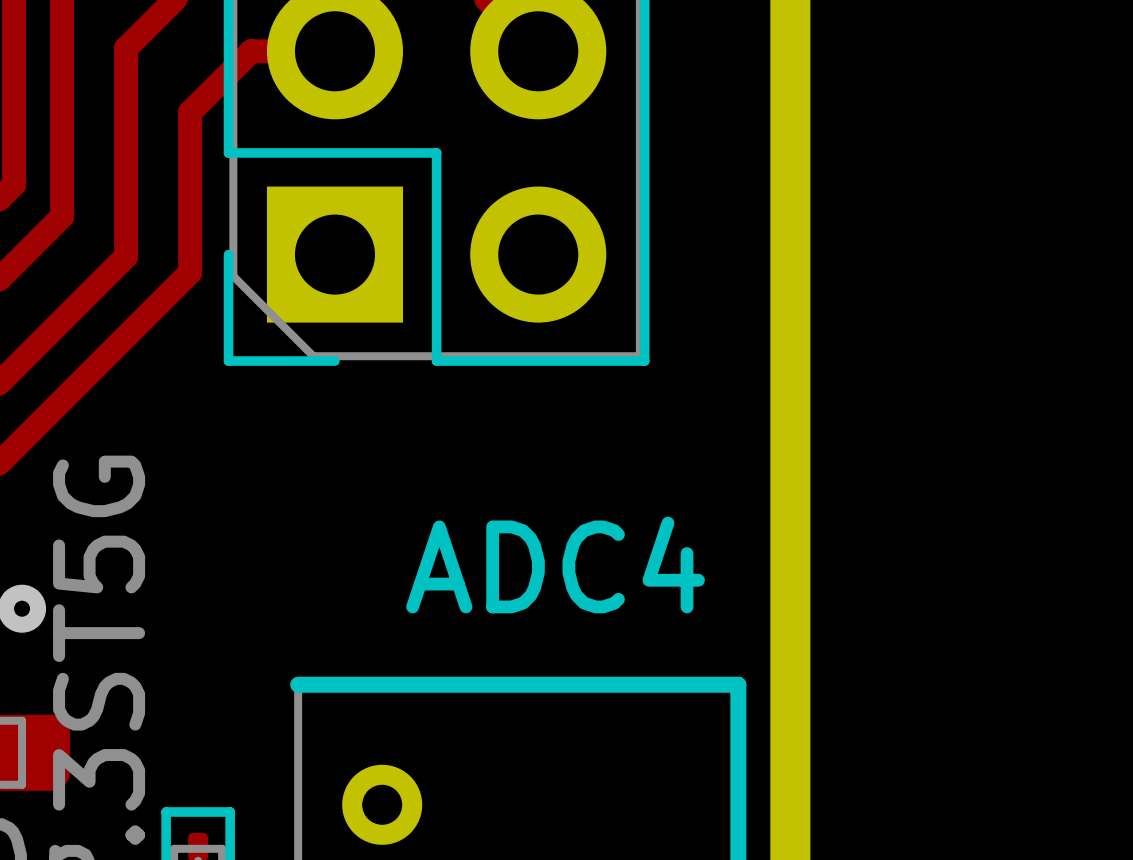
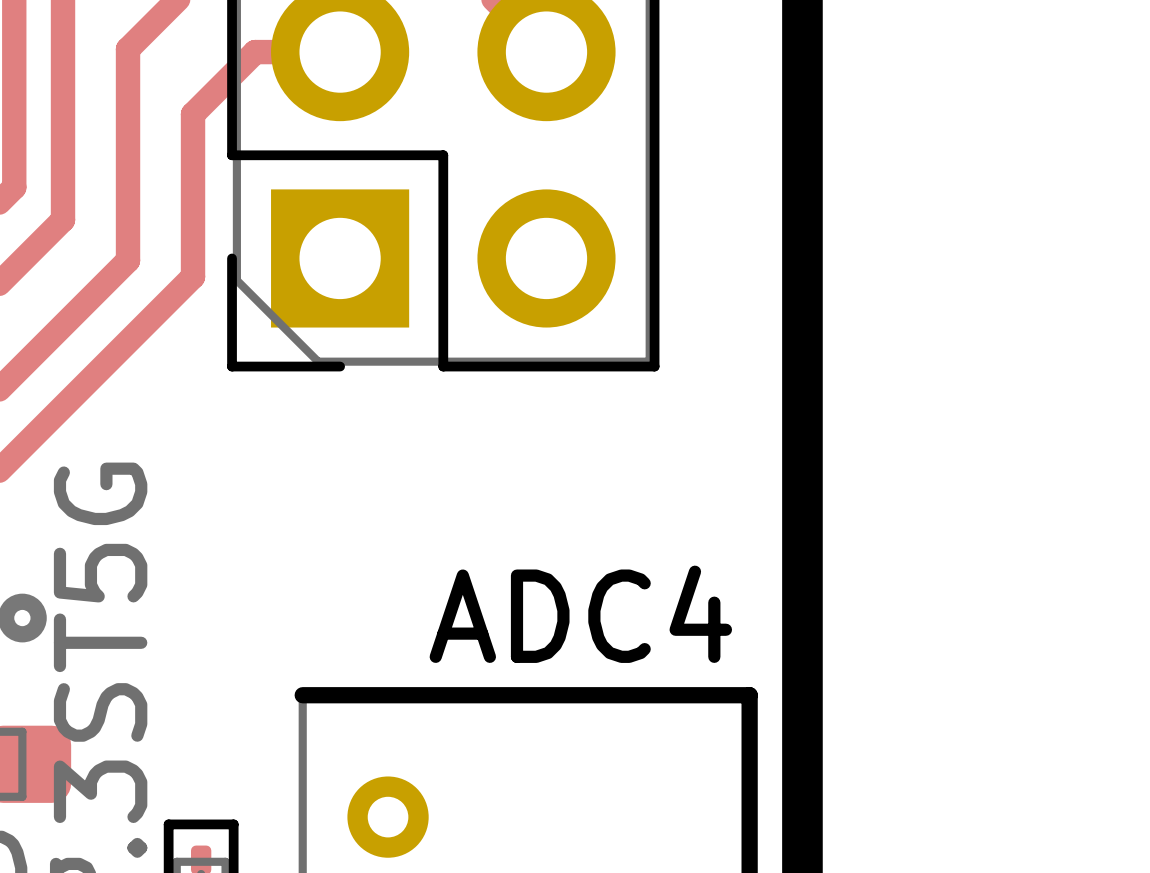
text position: ADC4 (555, 565) -> ADC4 (580, 614)

